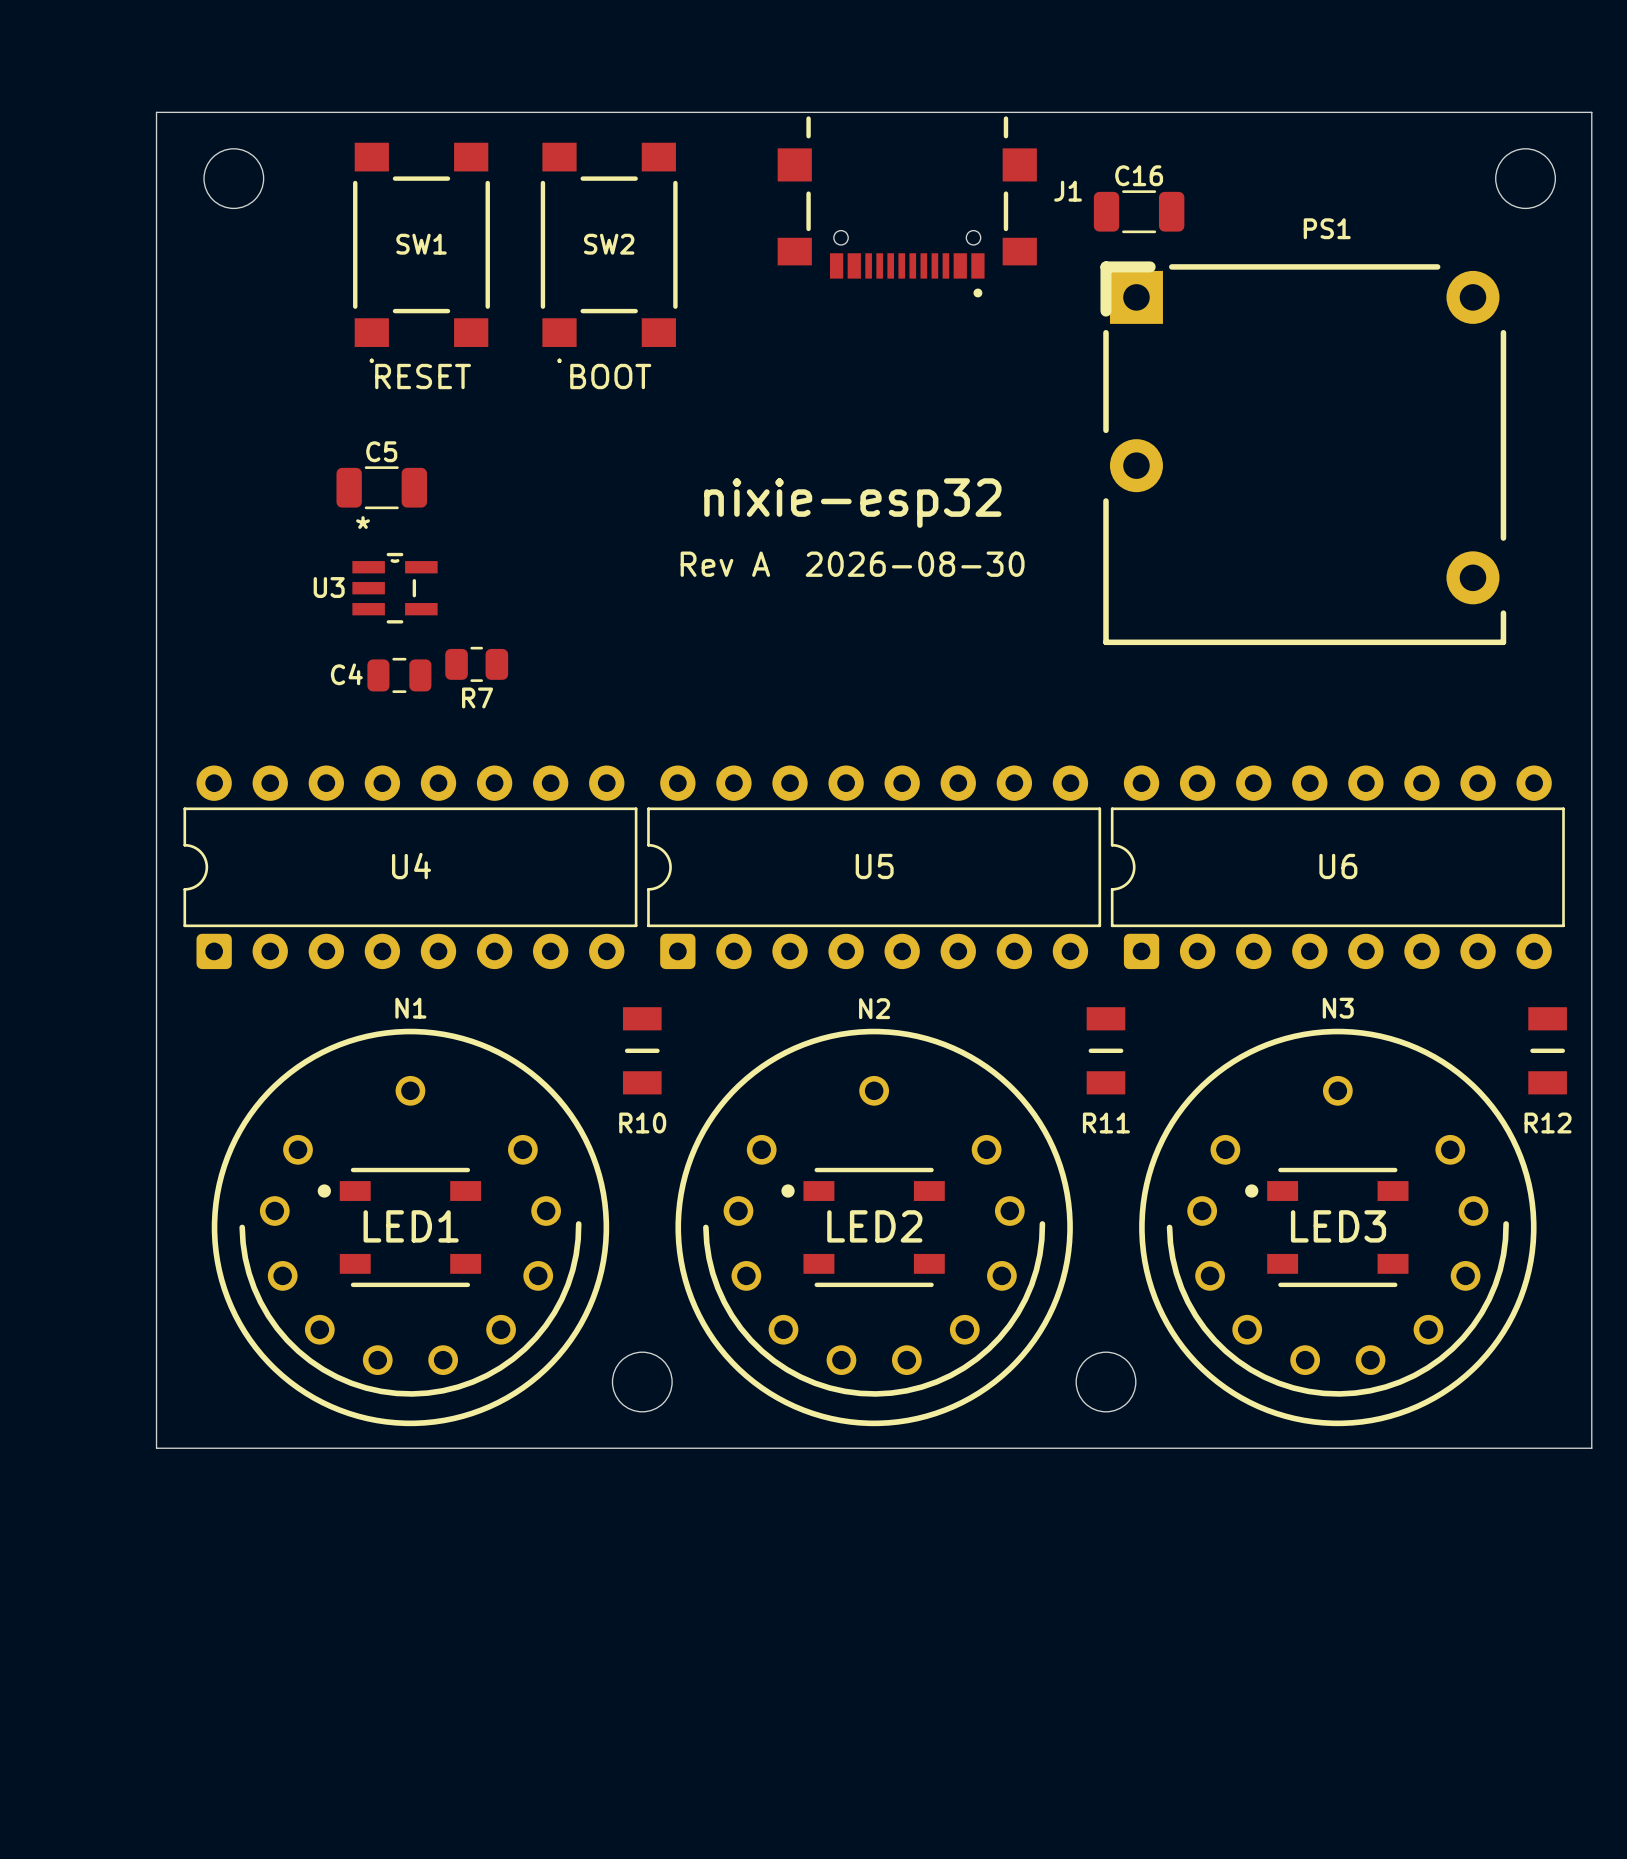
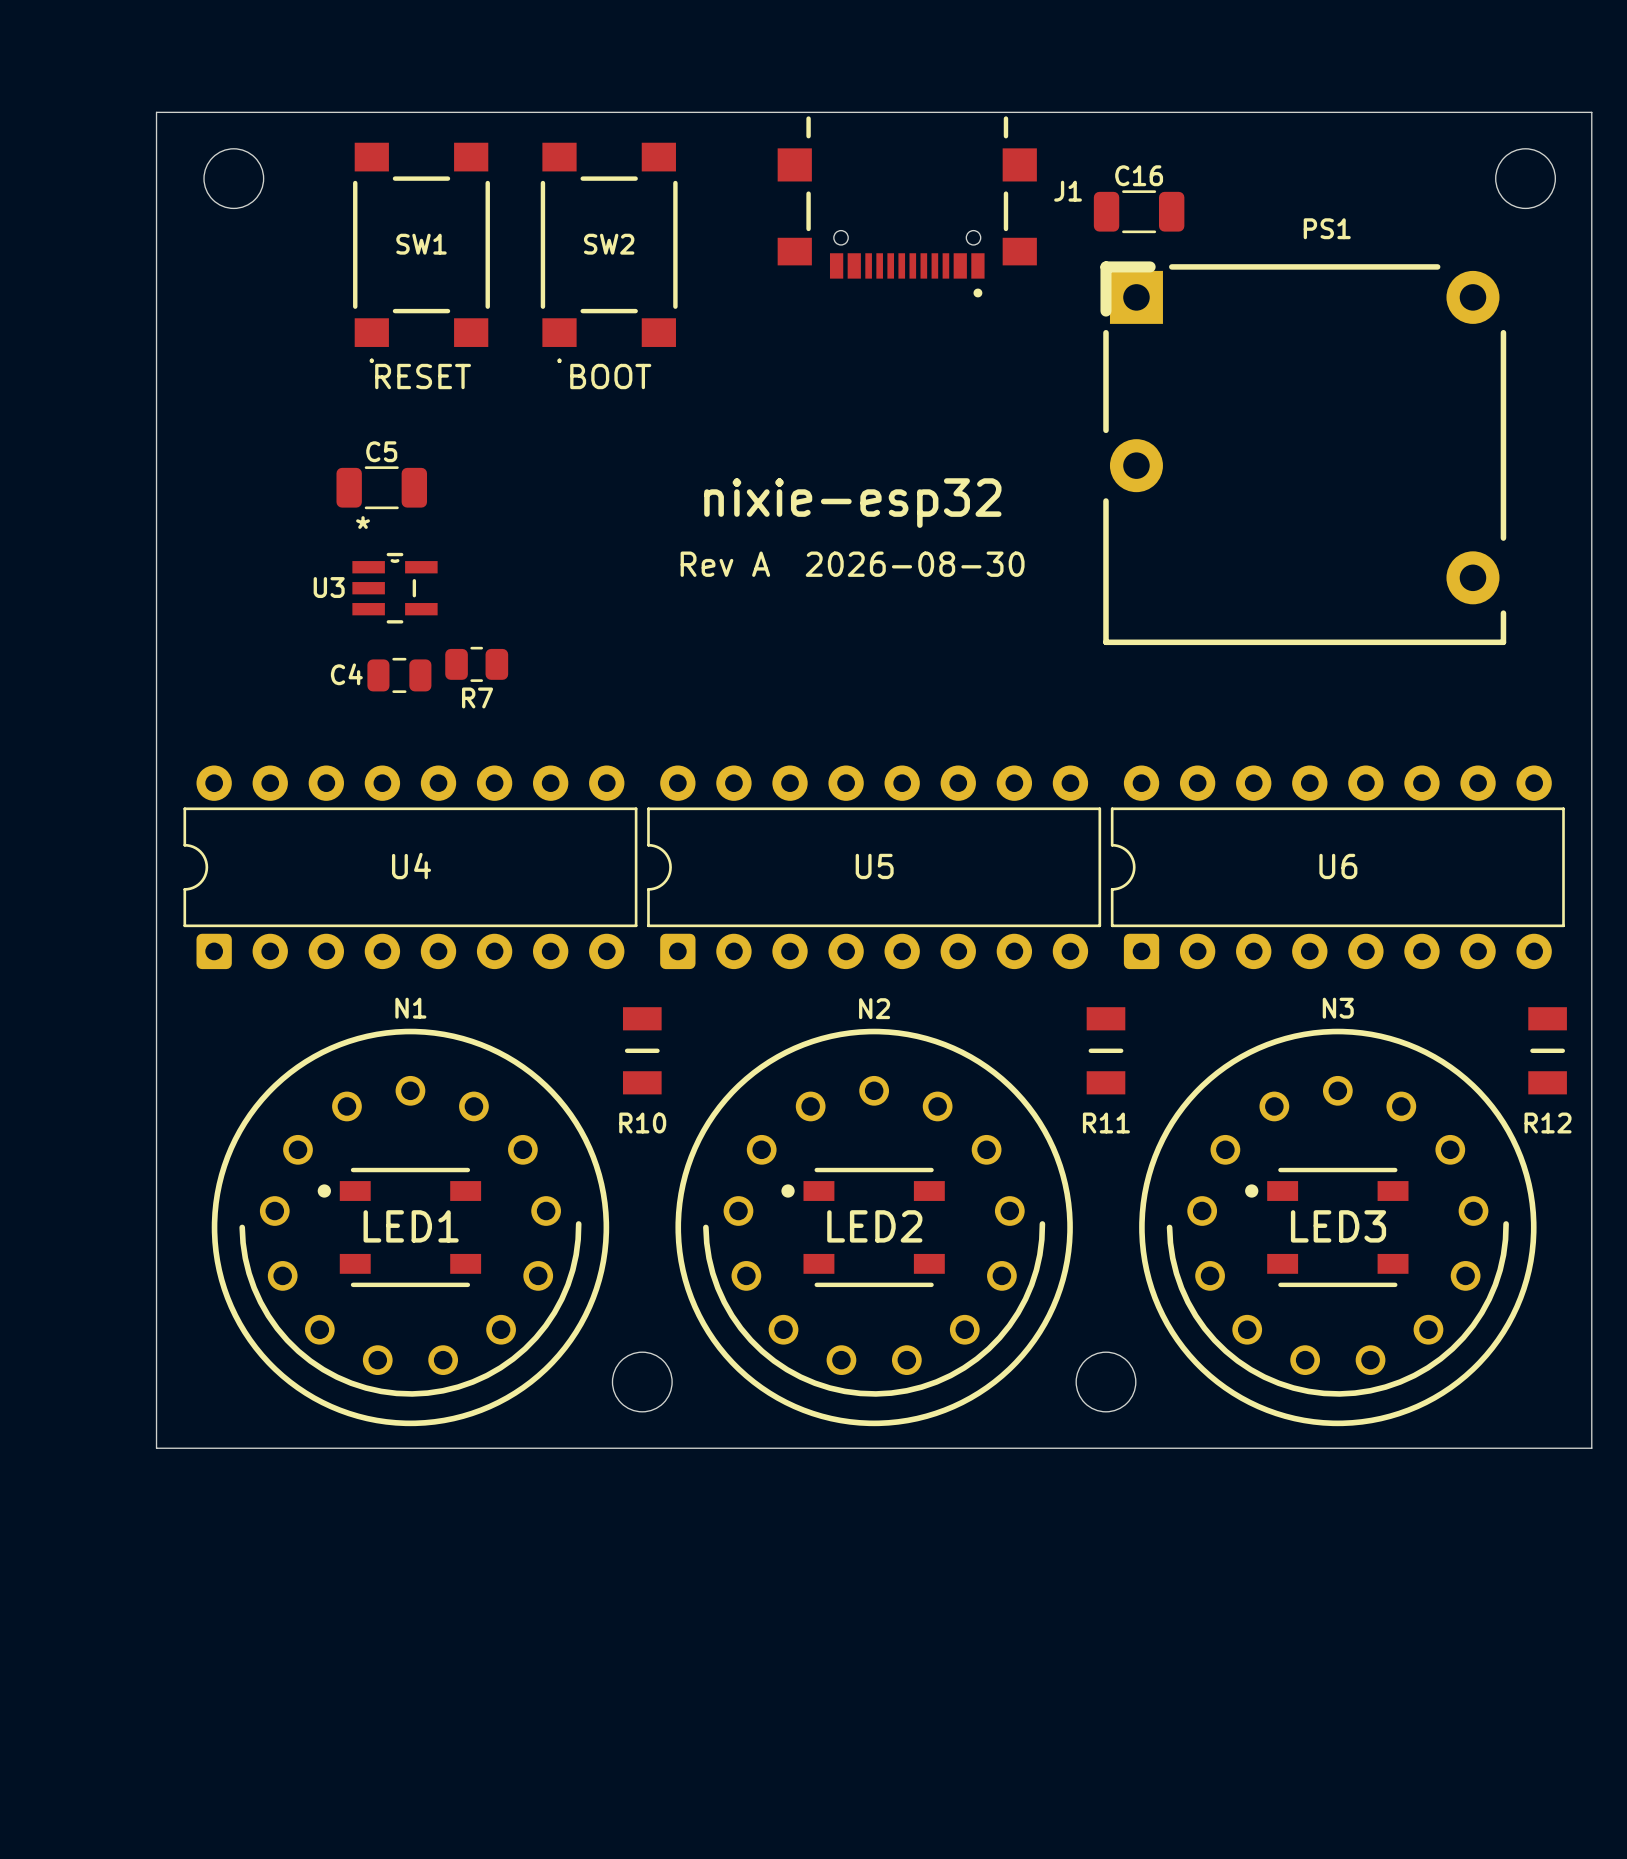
N1 footprint: [211, 1028, 610, 1427] -> [211, 1028, 610, 1427]
N2 footprint: [675, 1028, 1073, 1427] -> [675, 1028, 1073, 1427]
N3 footprint: [1139, 1028, 1537, 1427] -> [1139, 1028, 1537, 1427]

